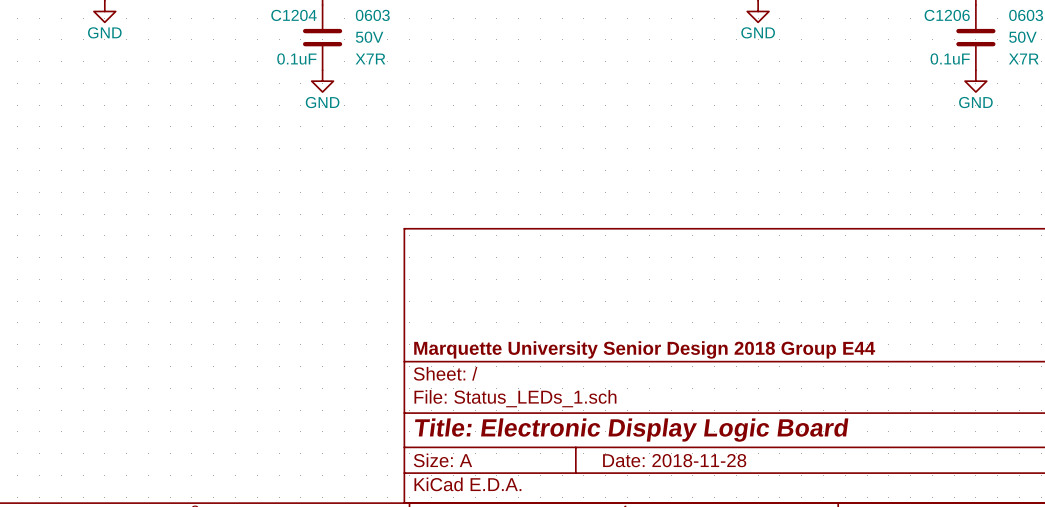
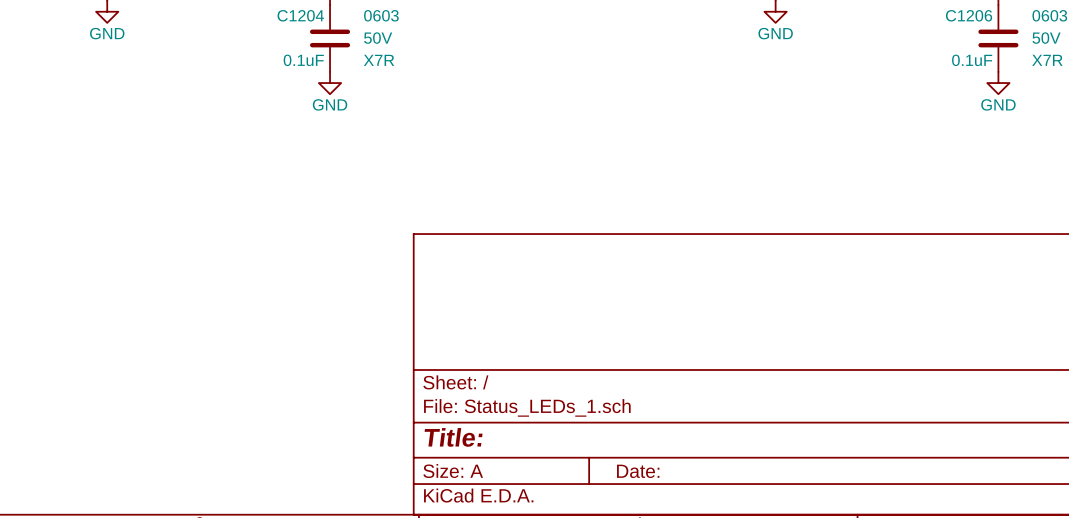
title block: Marquette University Senior Design 2018 Group E44 (644, 349) -> none
title block: Title: Electronic Display Logic Board (631, 430) -> Title: (453, 437)
title block: Date: 2018-11-28 (674, 460) -> Date: (638, 471)

